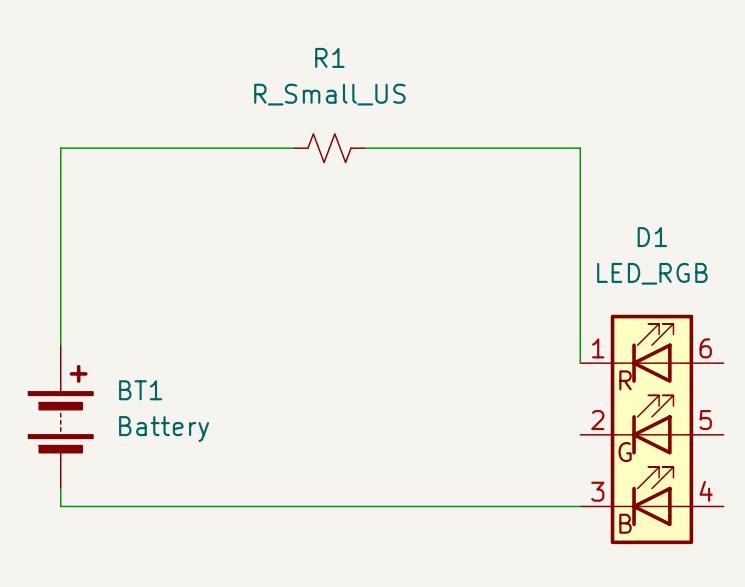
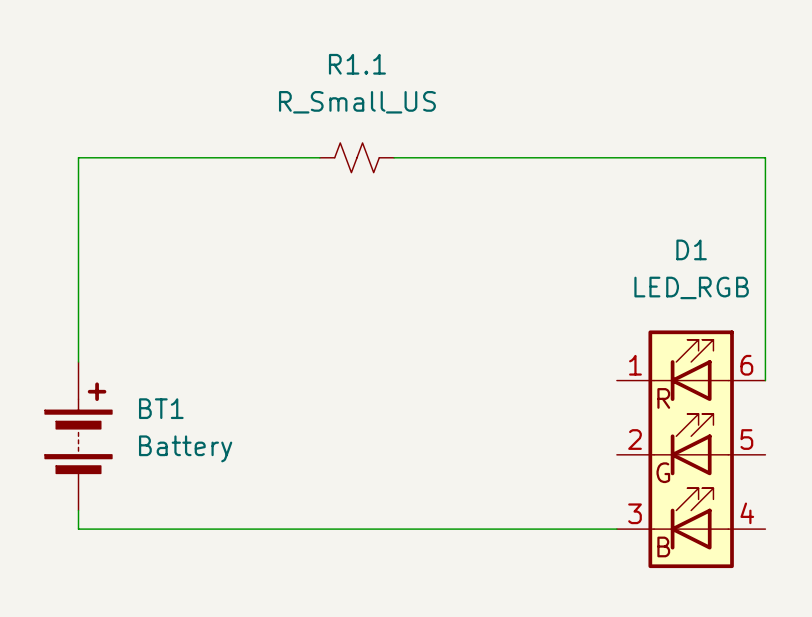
R1 name: R1 (329, 57) -> R1.1 (357, 64)
wire: (580, 148) (580, 363) -> (616, 157) (765, 157) (765, 380)

